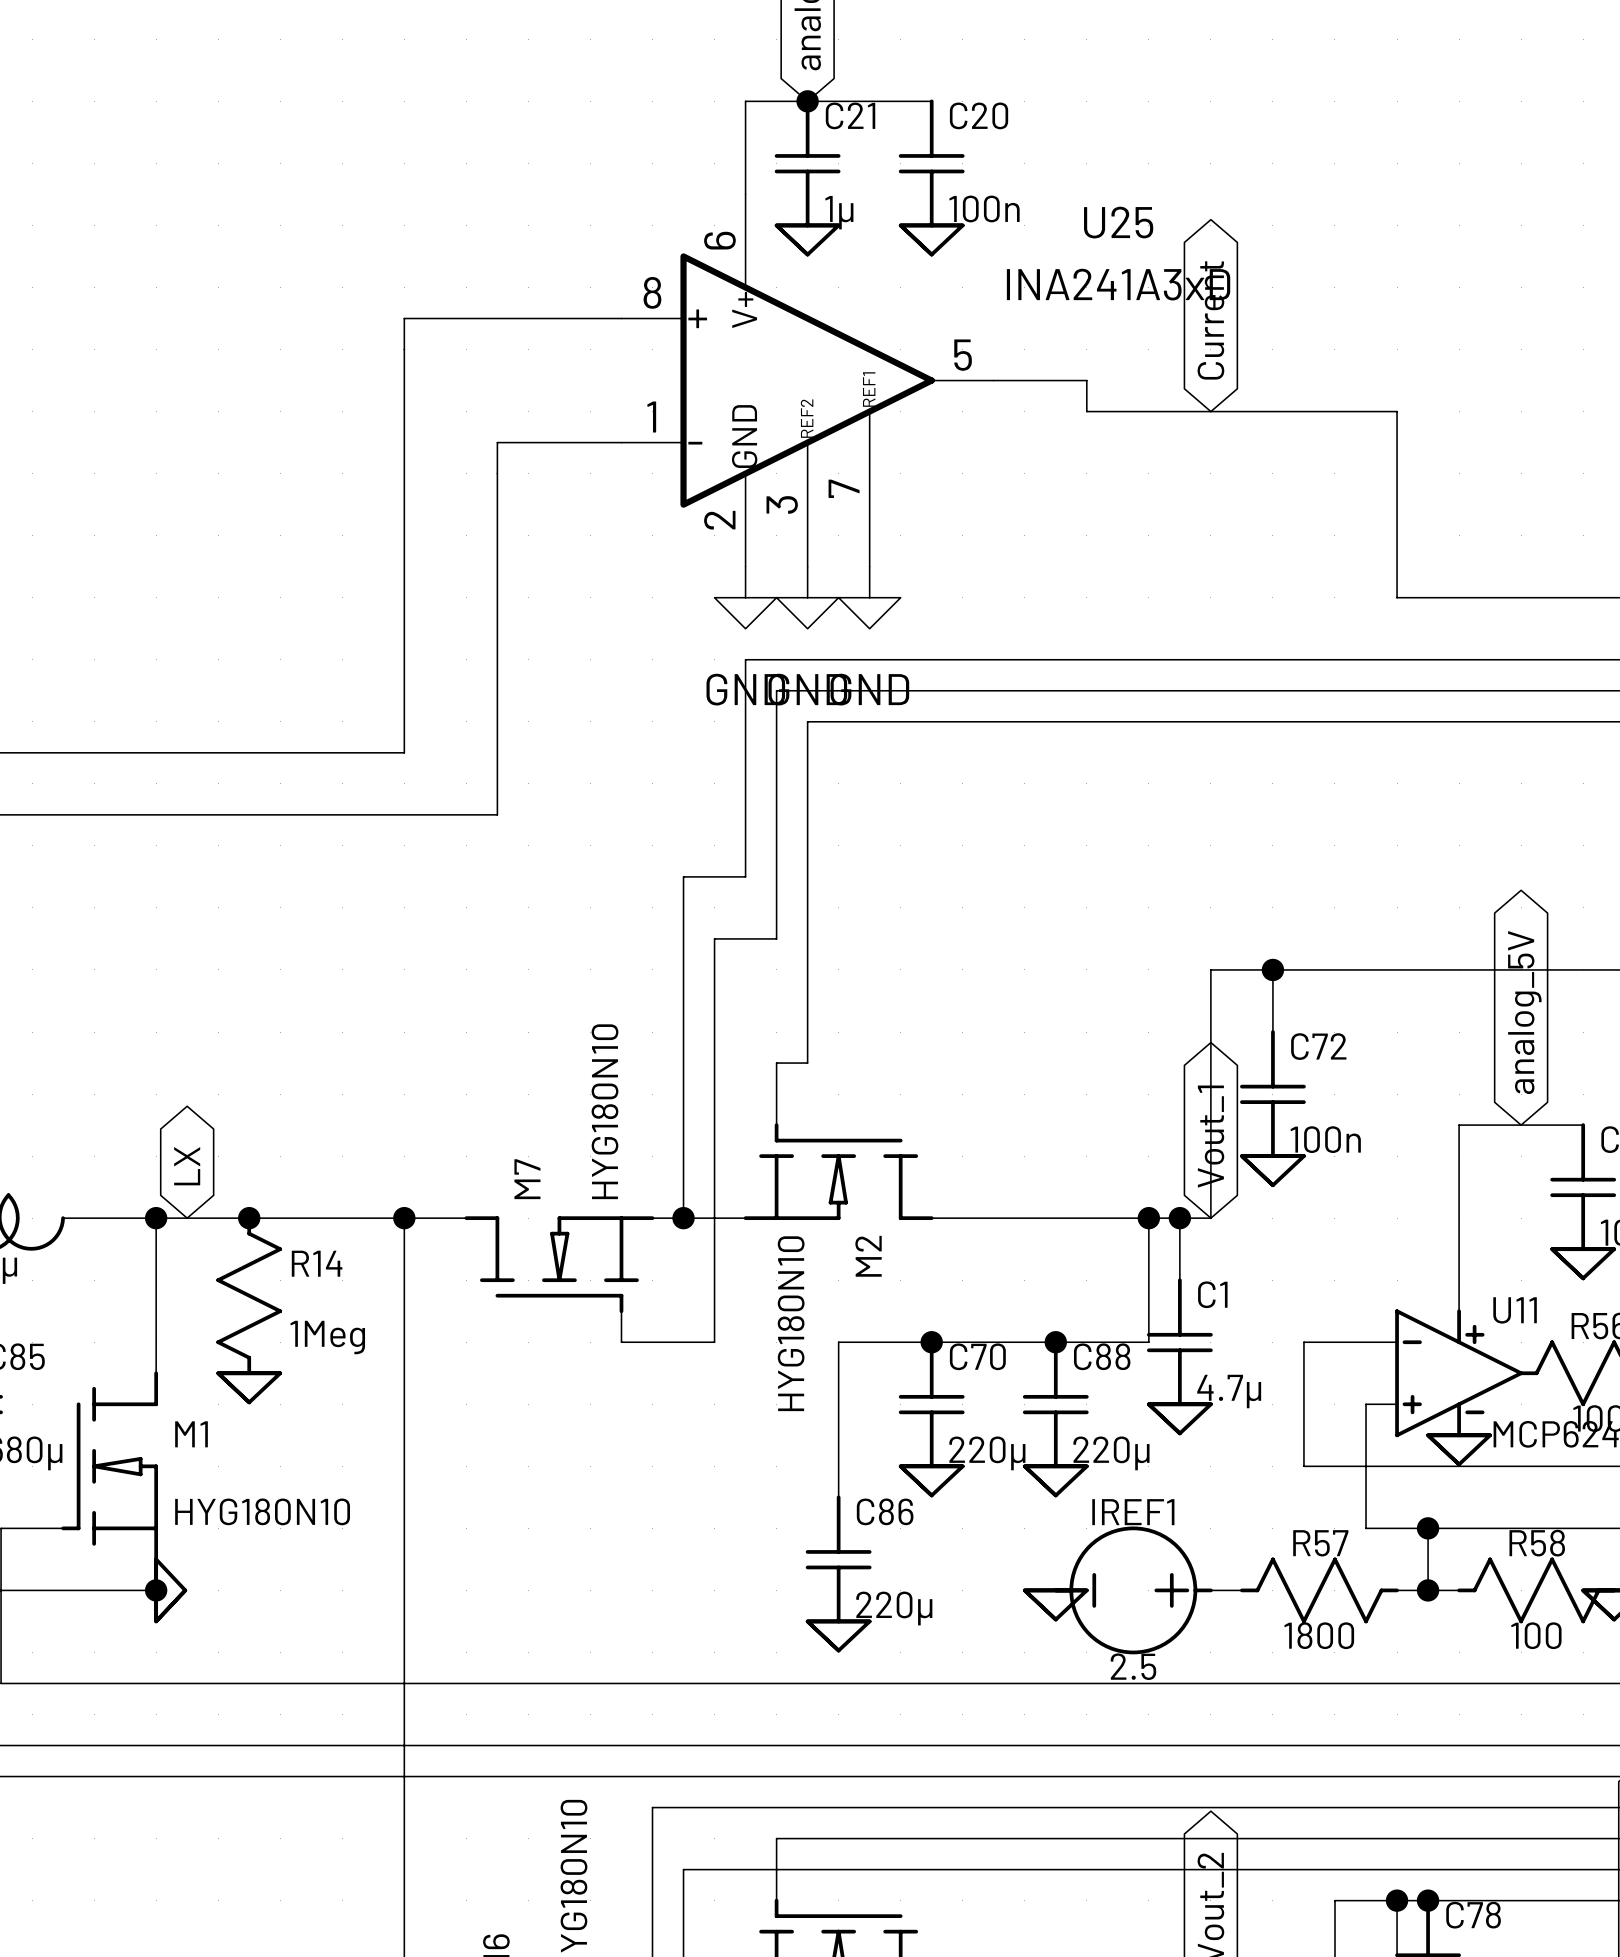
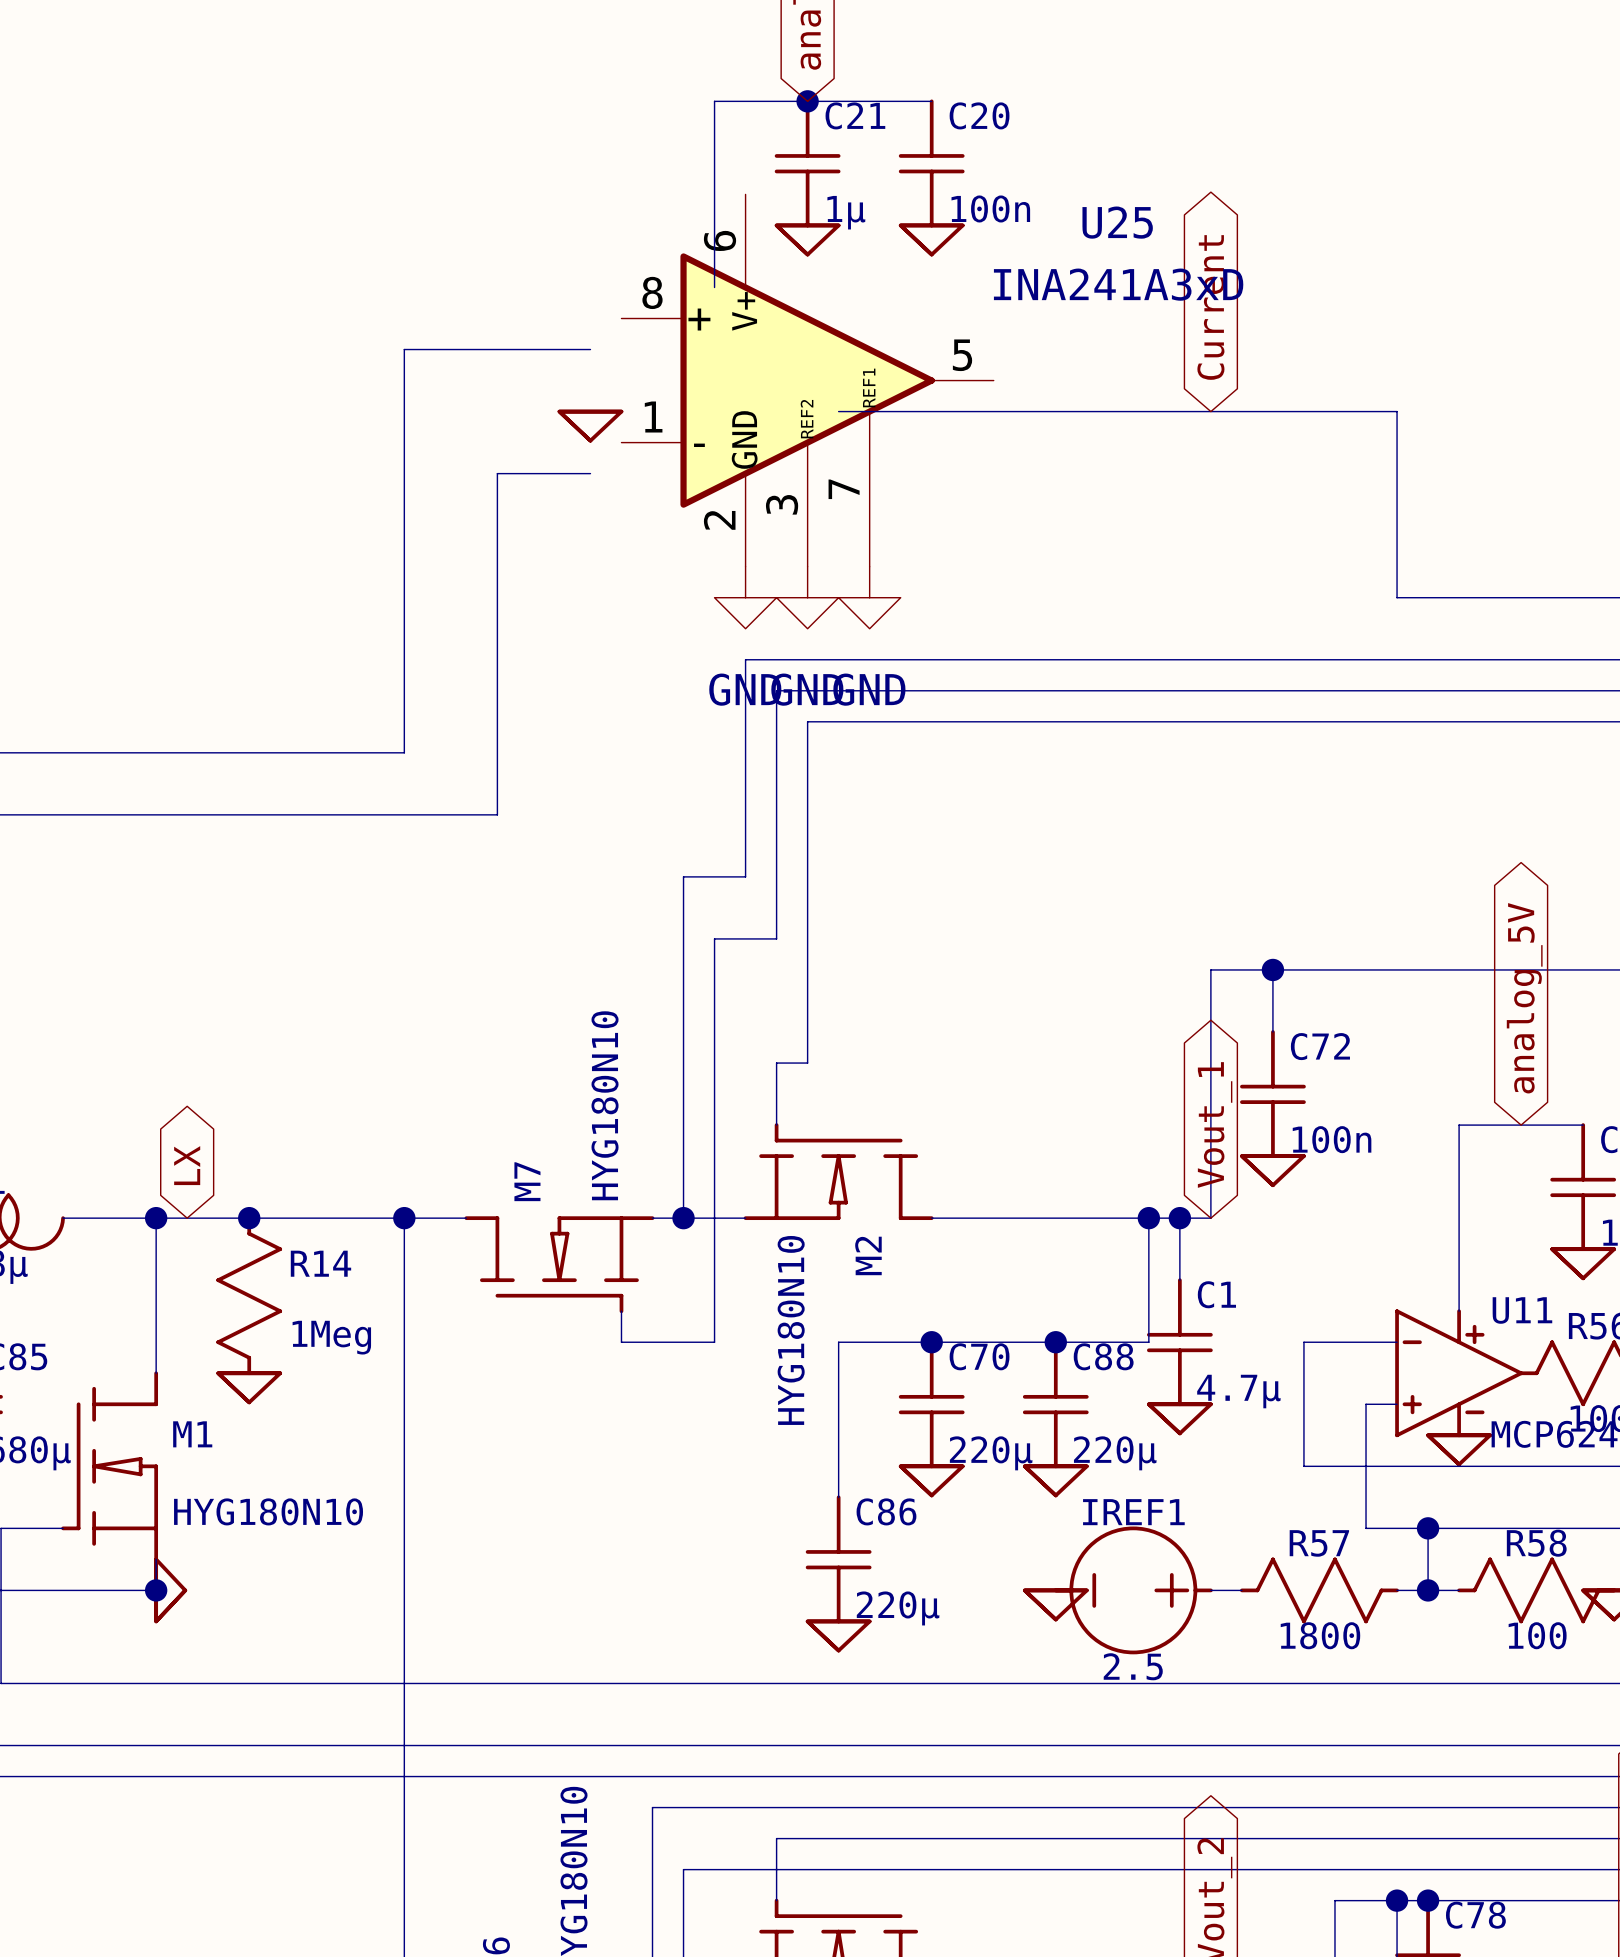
wire: (745, 101) (745, 194) -> (745, 101) (714, 101) (714, 287)
wire: (621, 318) (404, 318) (404, 349) -> (590, 349) (404, 349)
wire: (993, 380) (1086, 380) (1086, 411) -> (838, 411) (1086, 411)
power symbol: none -> (590, 426)
wire: (621, 442) (497, 442) (497, 473) -> (590, 473) (497, 473)

